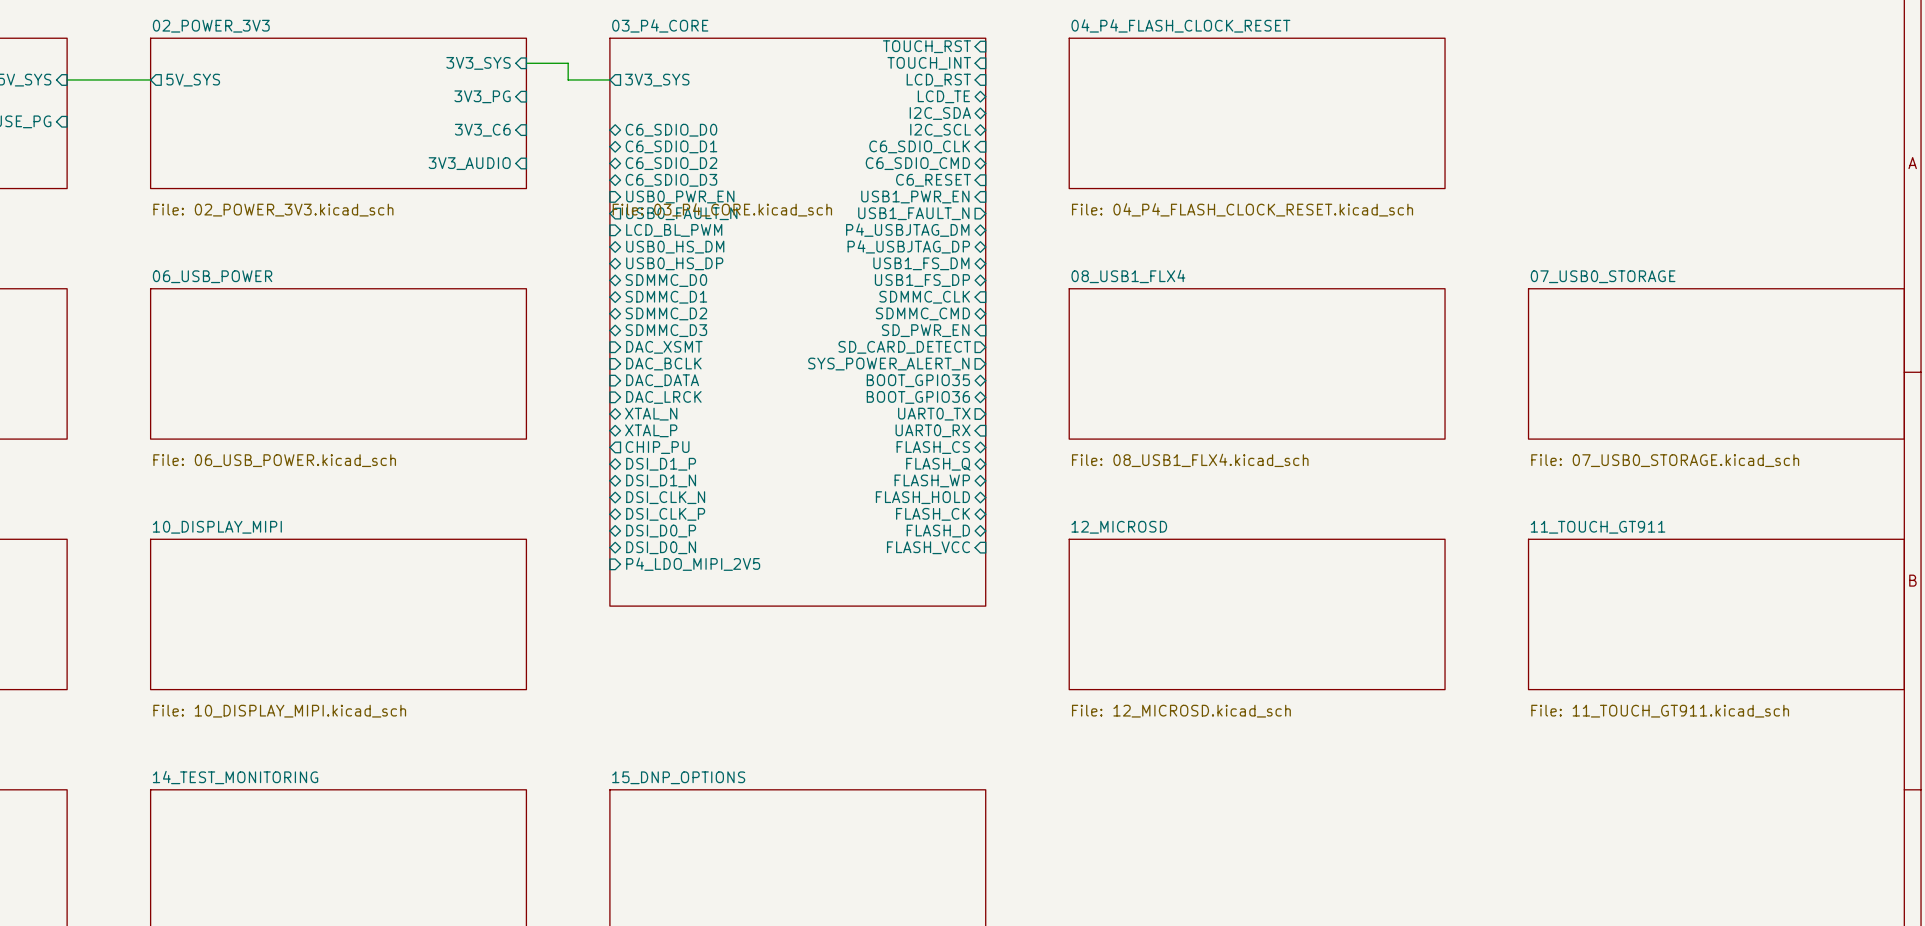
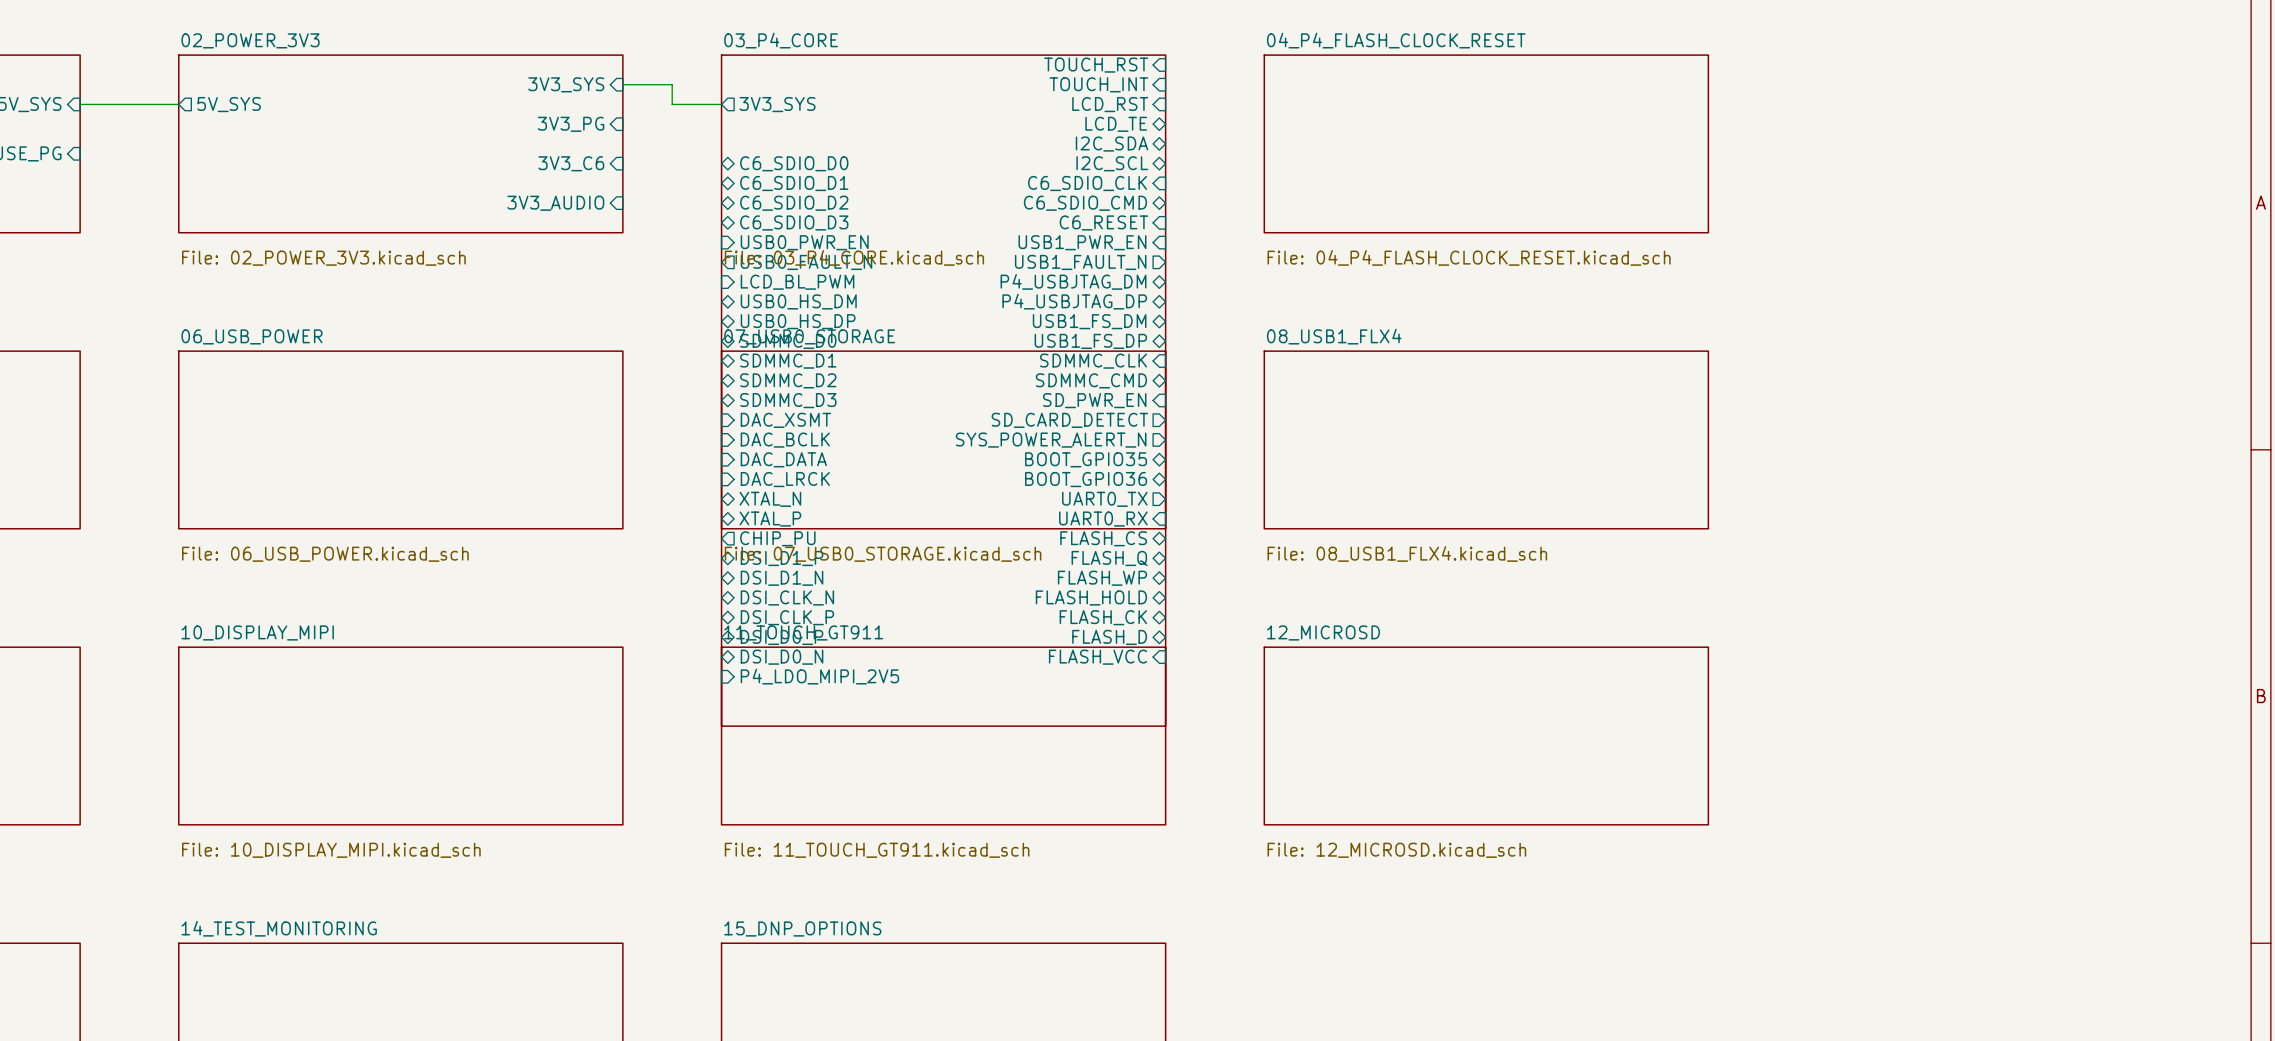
sheet 07_USB0_STORAGE position: (1716, 363) -> (943, 439)
sheet 11_TOUCH_GT911 position: (1716, 614) -> (943, 736)

